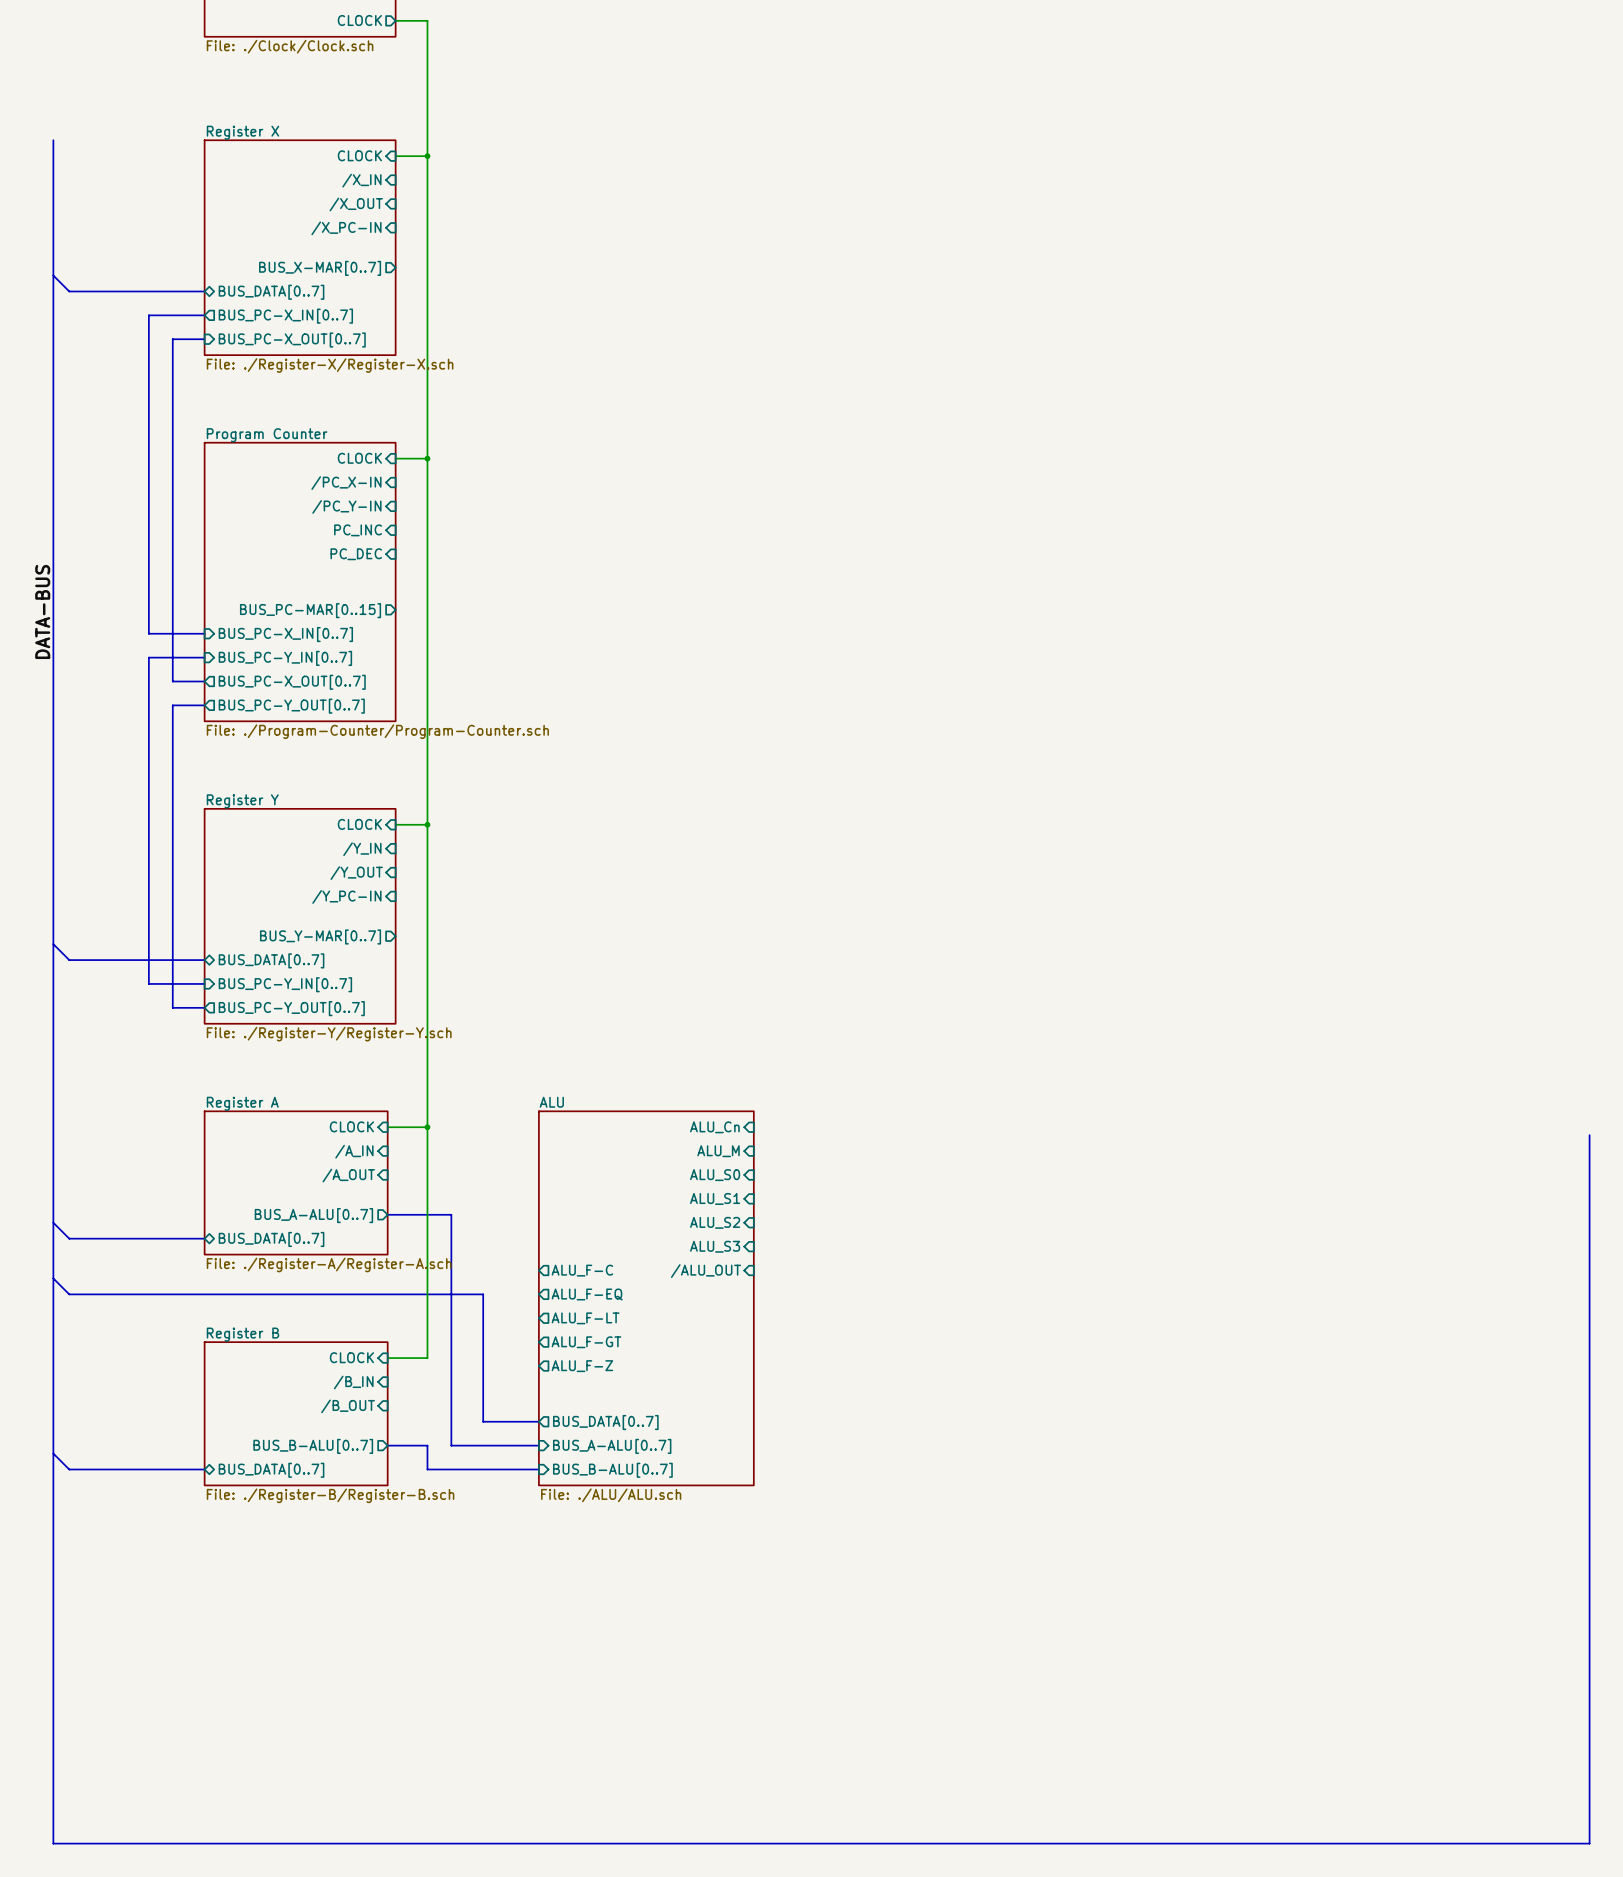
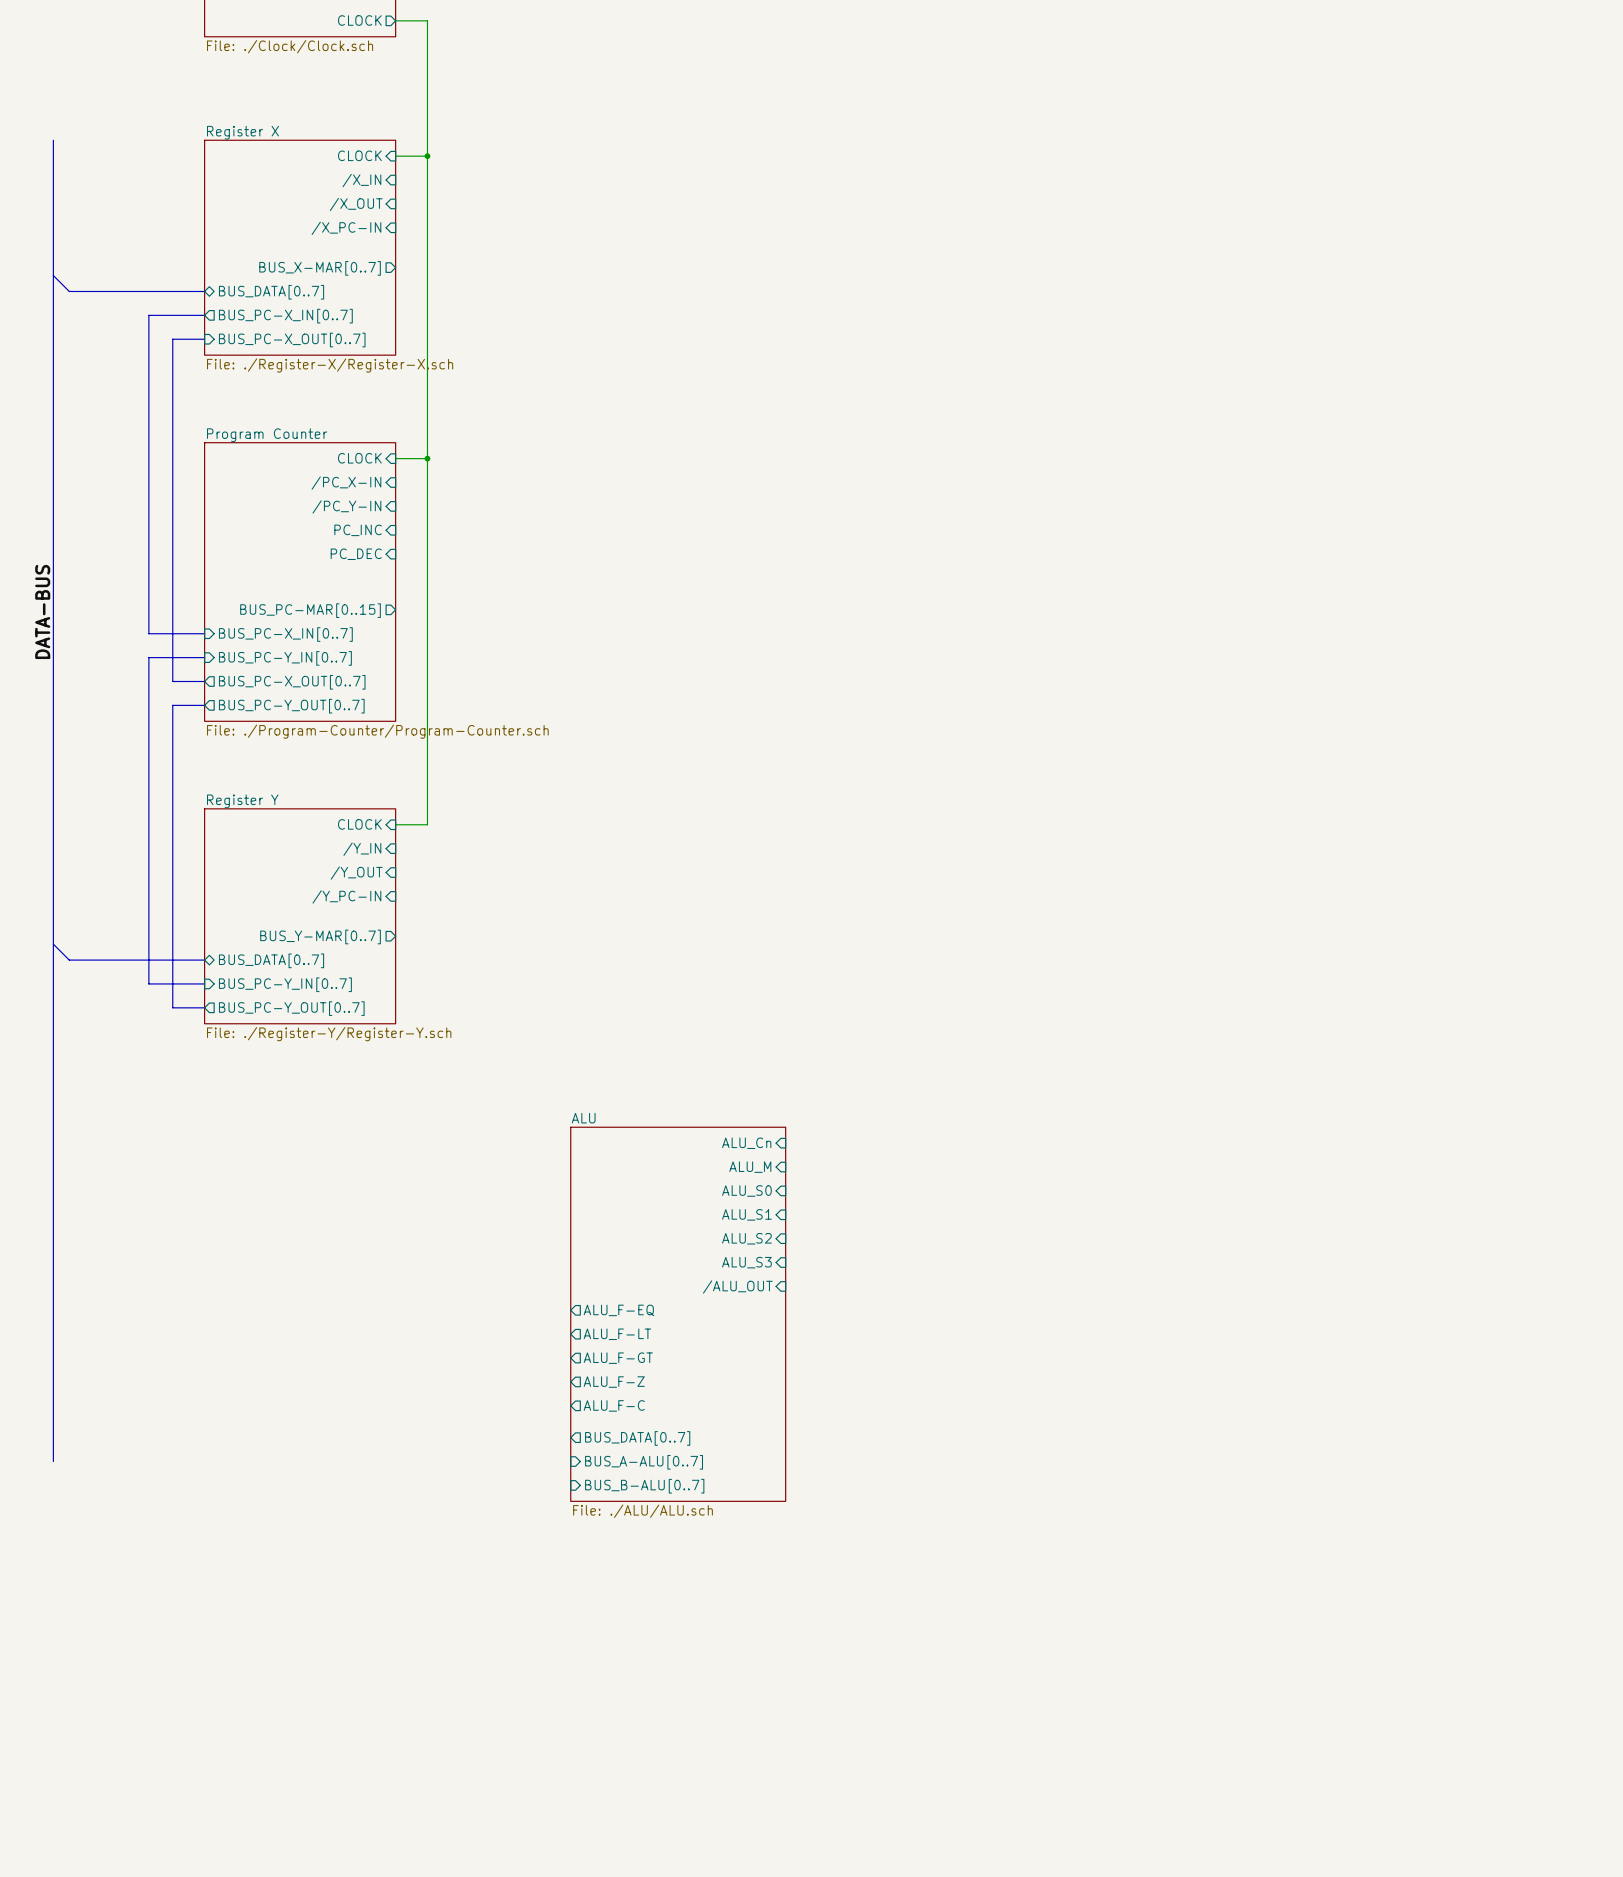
wire: (427, 824) (427, 1358) (387, 1358) -> none
junction: (427, 824) -> none
sheet pin: CLOCK (351, 1126) -> none
wire: (387, 1127) (427, 1127) -> none
junction: (427, 1127) -> none
sheet pin position: ALU_Cn (714, 1127) -> ALU_Cn (746, 1143)
bus: (1589, 1135) (1589, 1843) (53, 1843) (53, 1461) -> none
sheet pin: /A_IN (354, 1151) -> none
sheet pin position: ALU_M (718, 1151) -> ALU_M (750, 1167)
sheet pin: /A_OUT (348, 1175) -> none
sheet pin position: ALU_S0 (715, 1175) -> ALU_S0 (746, 1191)
sheet Register A: File: ./Register-A/Register-A.sch (296, 1182) -> none
sheet pin position: ALU_S1 (715, 1198) -> ALU_S1 (746, 1214)
bus: (387, 1214) (451, 1214) (451, 1445) (538, 1445) -> none
sheet pin: BUS_A-ALU[0..7] (313, 1215) -> none
bus: (53, 1222) (69, 1238) (204, 1238) -> none
sheet pin position: ALU_S2 (715, 1222) -> ALU_S2 (746, 1238)
sheet pin: BUS_DATA[0..7] (271, 1239) -> none
sheet pin position: ALU_S3 (715, 1246) -> ALU_S3 (746, 1262)
sheet pin position: ALU_F-C (582, 1270) -> ALU_F-C (614, 1405)
sheet pin position: /ALU_OUT (706, 1271) -> /ALU_OUT (737, 1286)
bus: (53, 1278) (69, 1294) (483, 1294) (483, 1421) (538, 1421) -> none
sheet pin position: ALU_F-EQ (587, 1294) -> ALU_F-EQ (619, 1310)
sheet ALU position: (646, 1298) -> (678, 1314)
sheet pin position: ALU_F-LT (585, 1318) -> ALU_F-LT (617, 1334)
sheet pin position: ALU_F-GT (586, 1342) -> ALU_F-GT (618, 1358)
sheet pin: CLOCK (351, 1357) -> none
sheet pin position: ALU_F-Z (582, 1366) -> ALU_F-Z (614, 1382)
sheet pin: /B_IN (353, 1382) -> none
sheet pin: /B_OUT (348, 1406) -> none
sheet Register B: File: ./Register-B/Register-B.sch (296, 1413) -> none
sheet pin position: BUS_DATA[0..7] (605, 1422) -> BUS_DATA[0..7] (637, 1438)
bus: (387, 1445) (427, 1445) (427, 1469) (538, 1469) -> none
sheet pin: BUS_B-ALU[0..7] (313, 1446) -> none
sheet pin position: BUS_A-ALU[0..7] (612, 1446) -> BUS_A-ALU[0..7] (644, 1462)
bus: (53, 1453) (69, 1469) (204, 1469) -> none
sheet pin: BUS_DATA[0..7] (271, 1470) -> none
sheet pin position: BUS_B-ALU[0..7] (612, 1470) -> BUS_B-ALU[0..7] (644, 1486)

